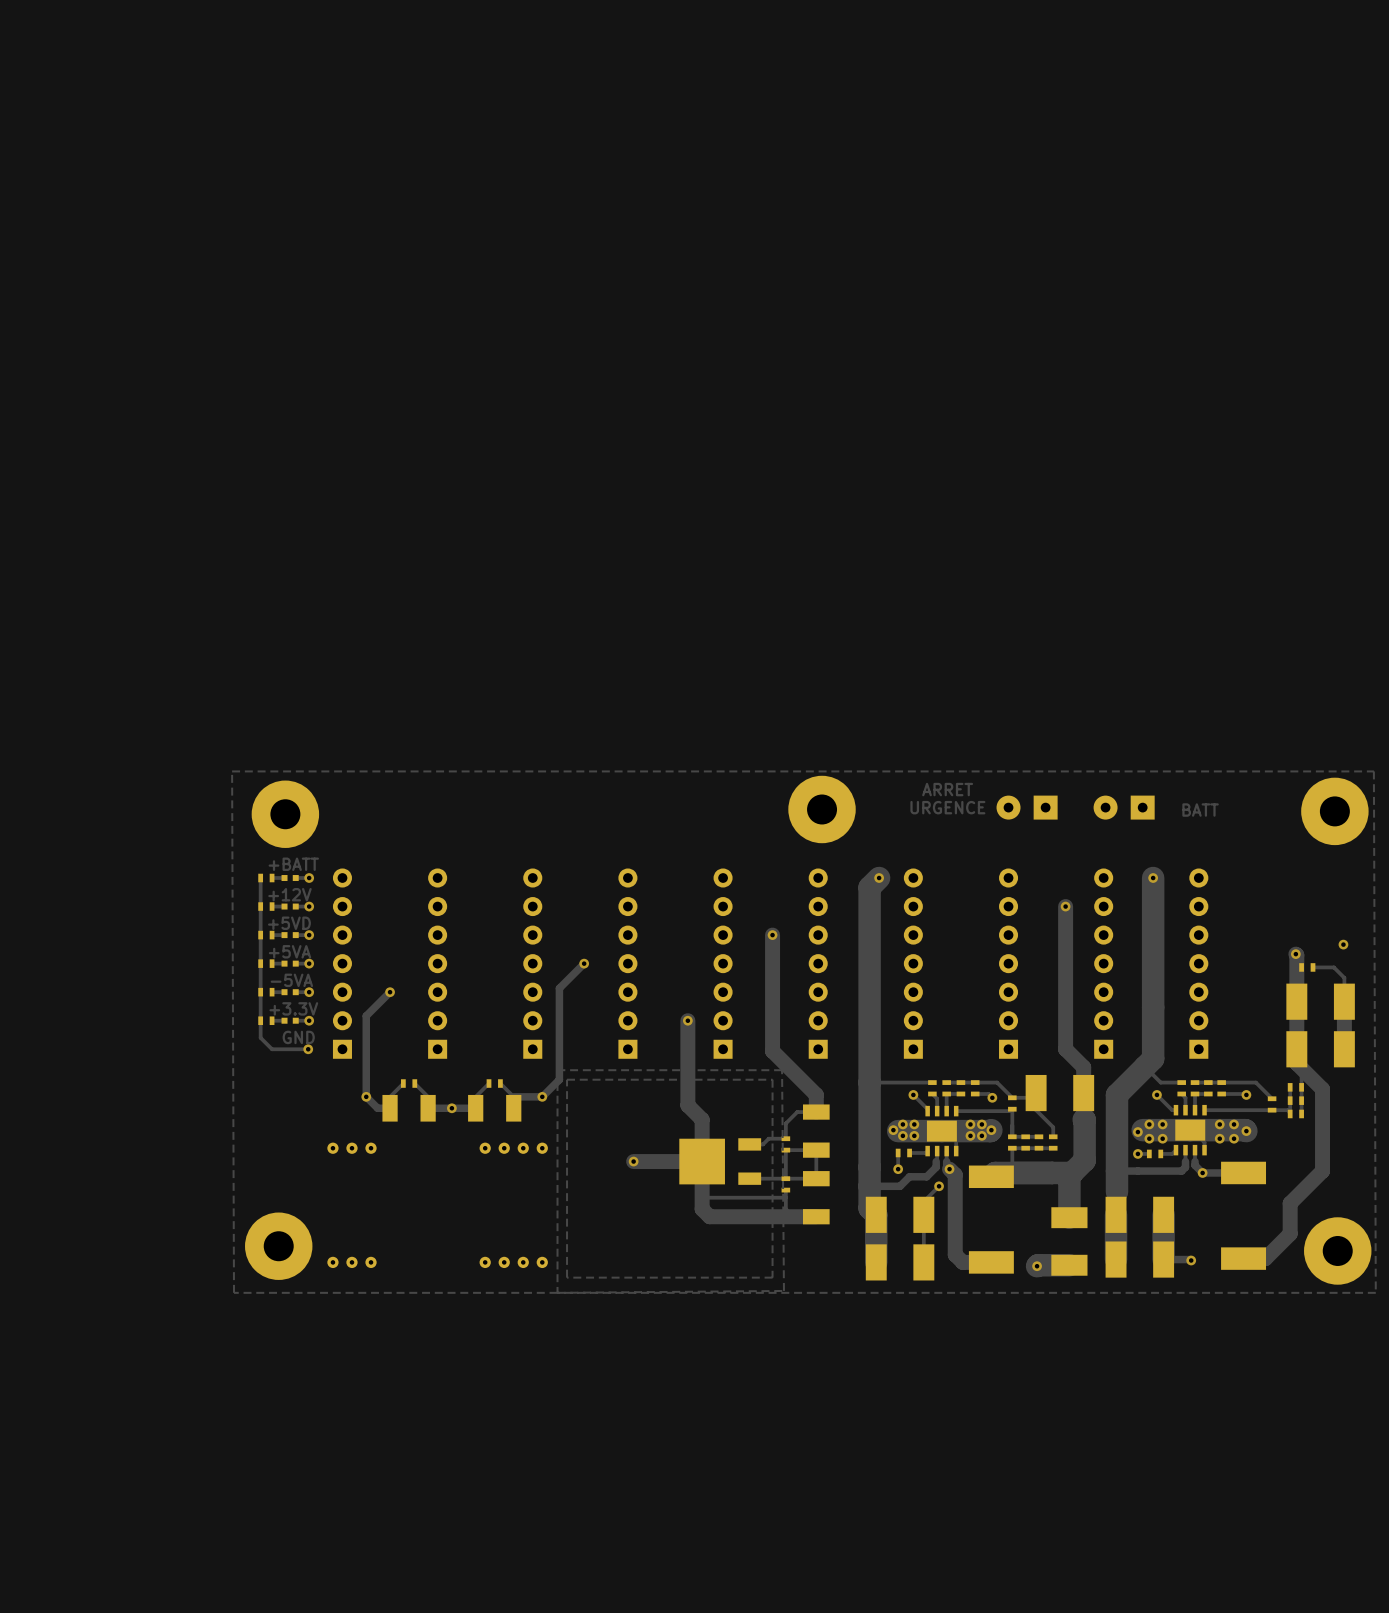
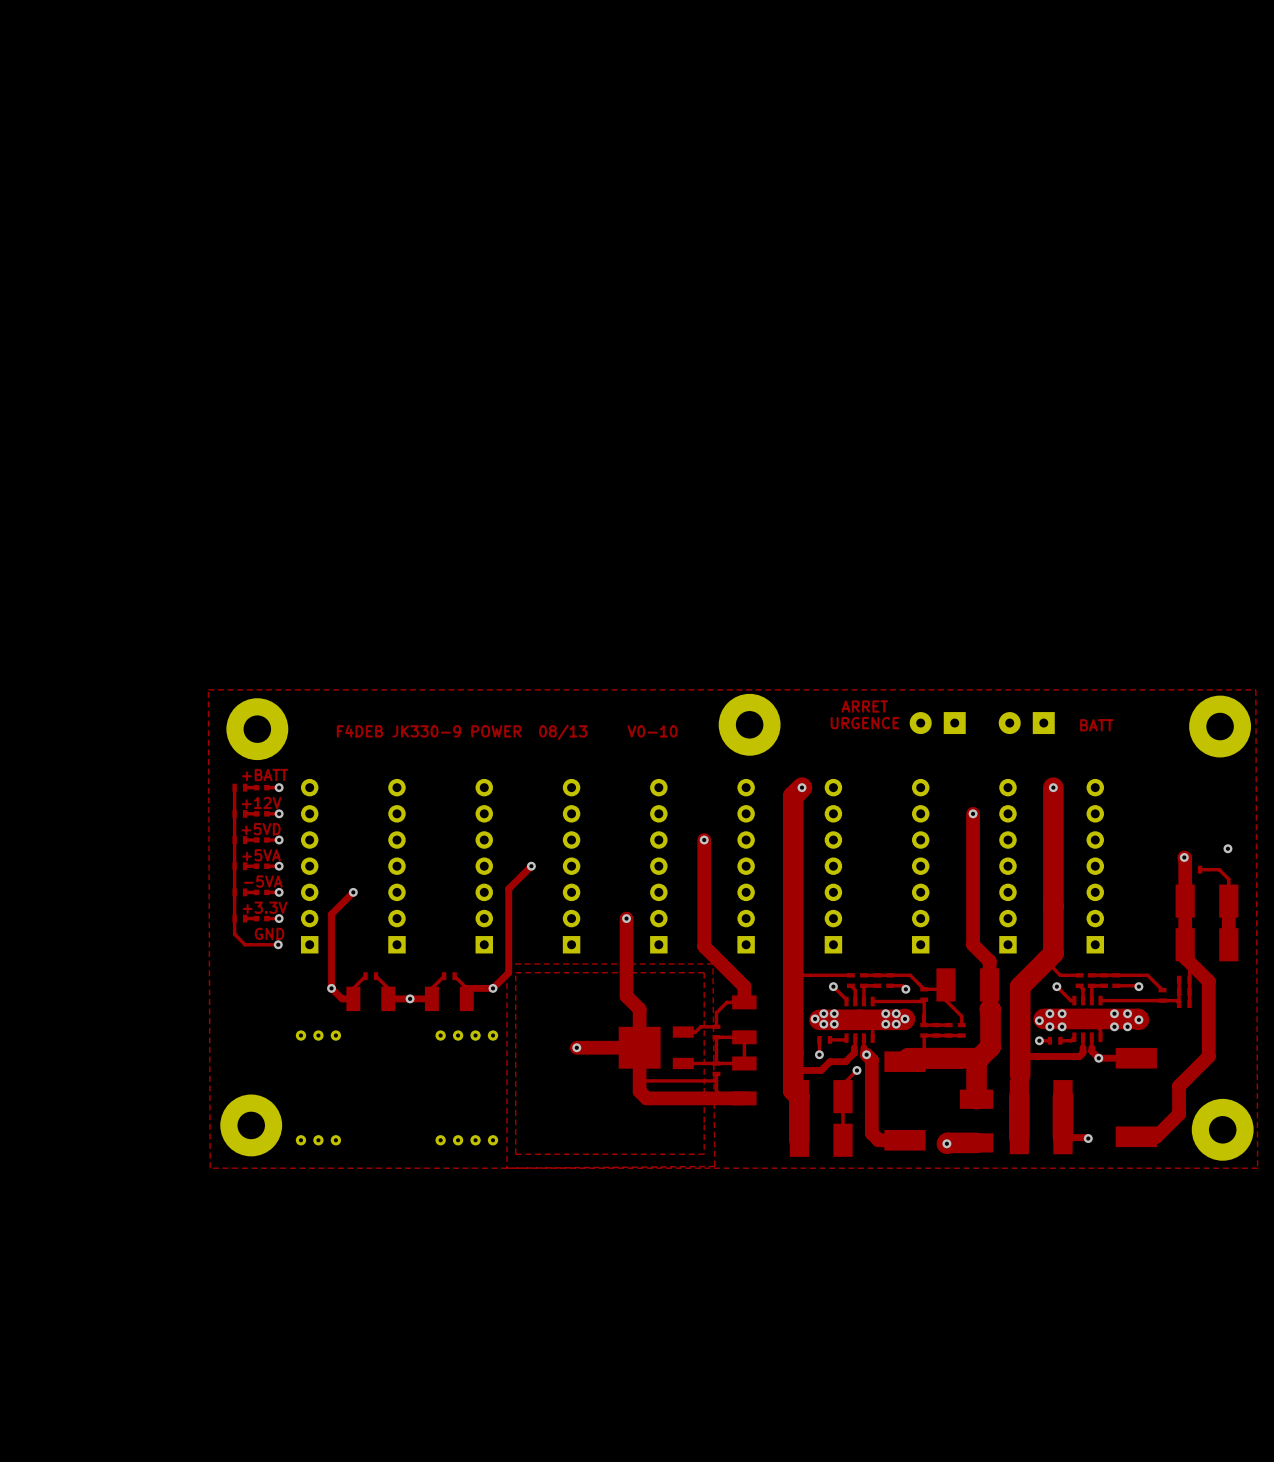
text: none -> F4DEB JK330-9 POWER 08/13 V0-10 (507, 732)

